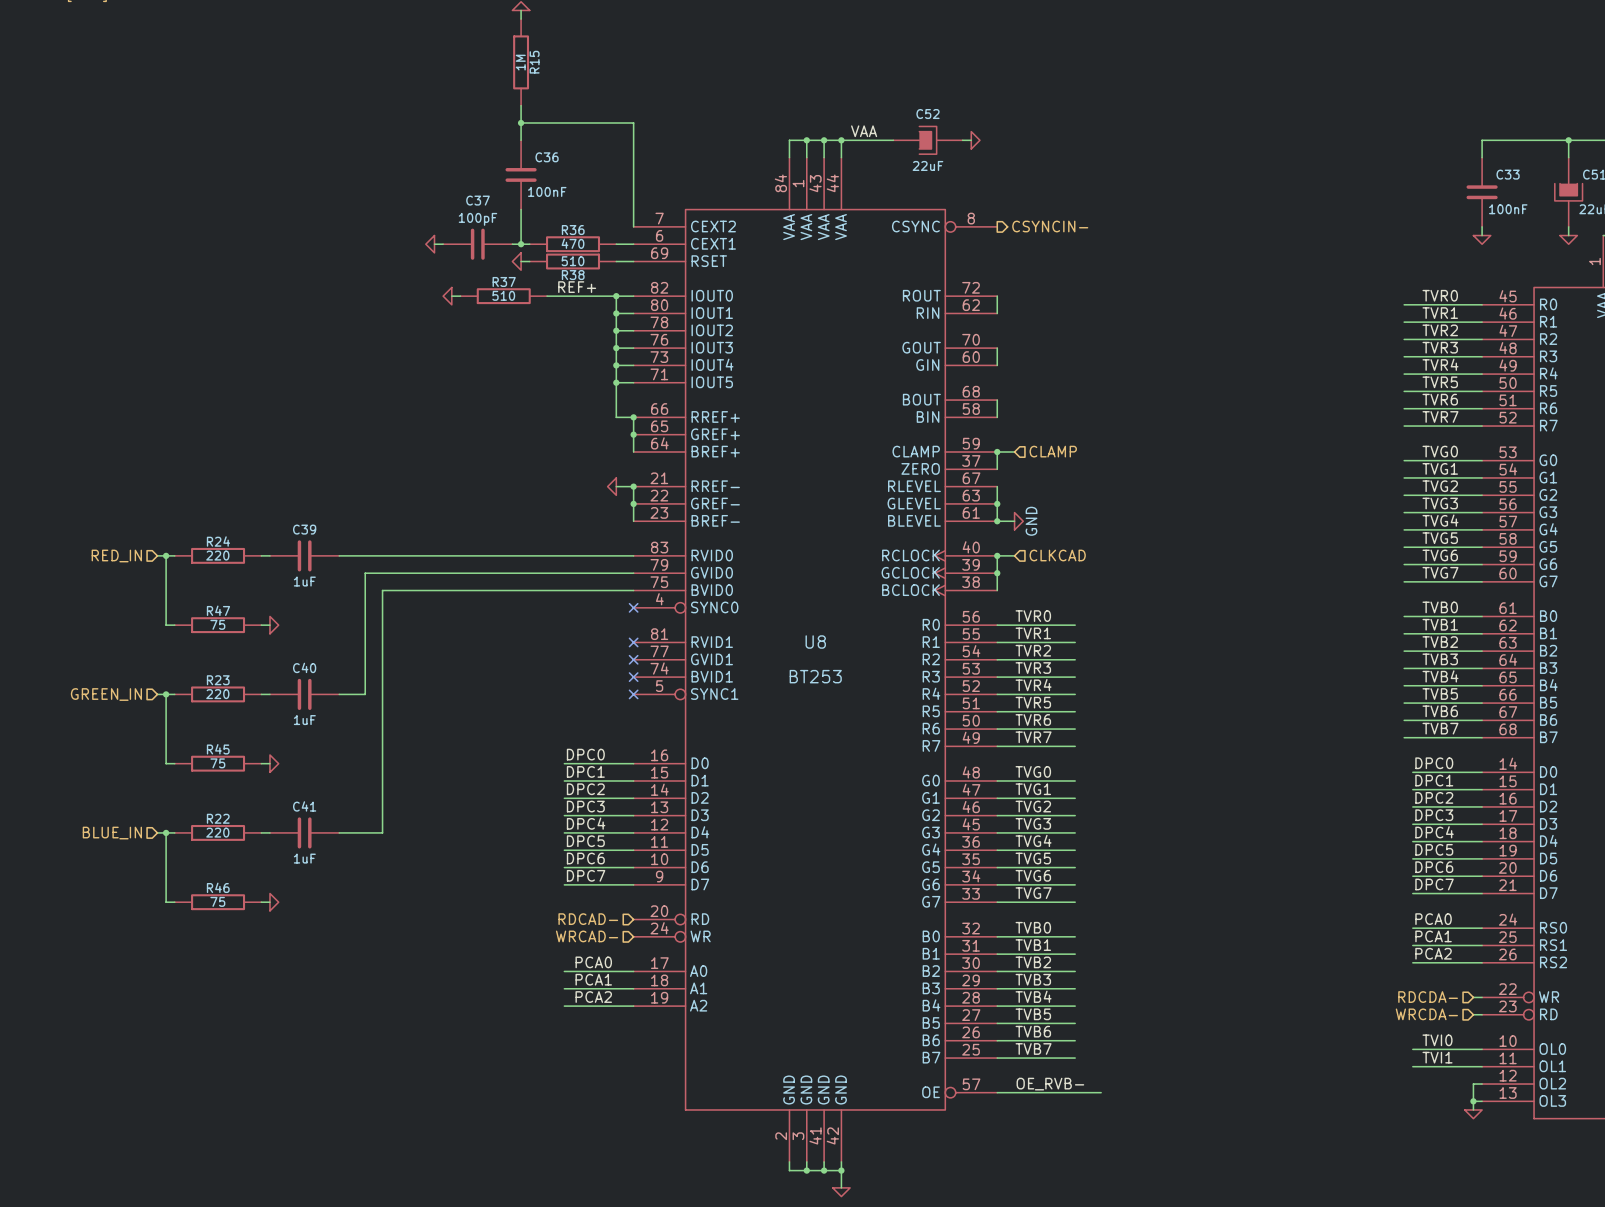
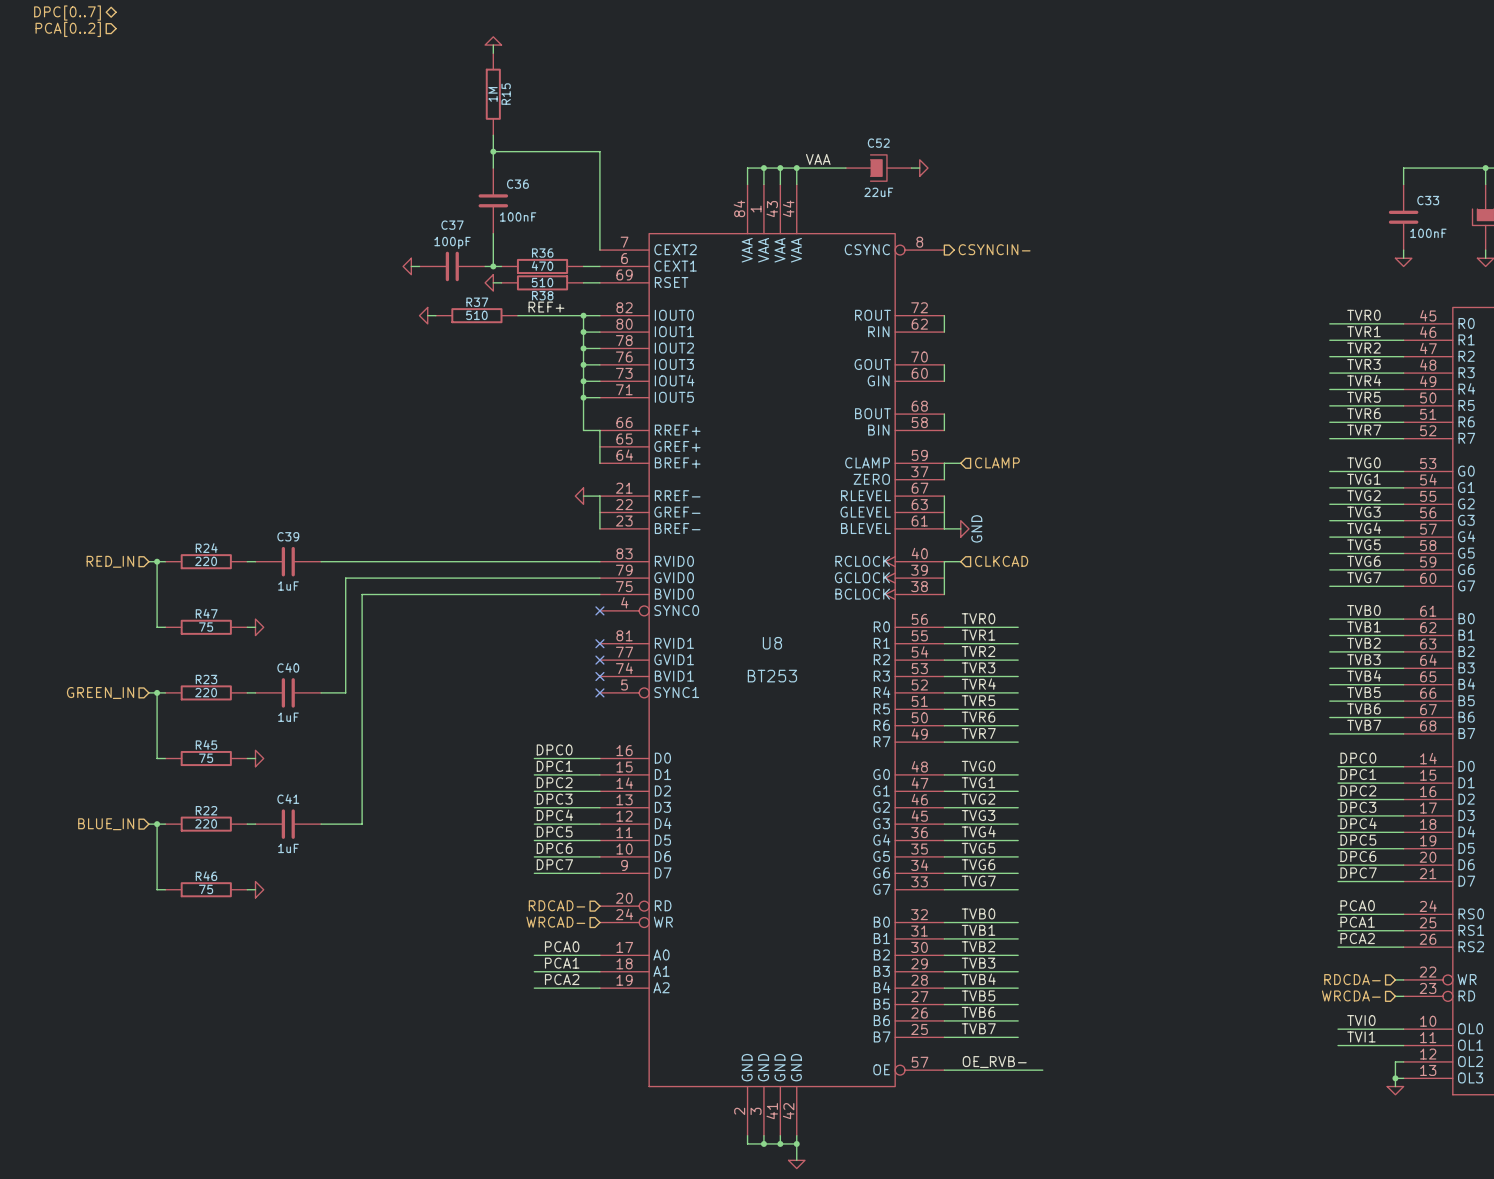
junction: (633, 417) -> none
junction: (633, 434) -> none
junction: (997, 451) -> none
junction: (633, 486) -> none
junction: (633, 503) -> none
junction: (997, 503) -> none
junction: (997, 521) -> none
junction: (997, 555) -> none
junction: (997, 573) -> none

